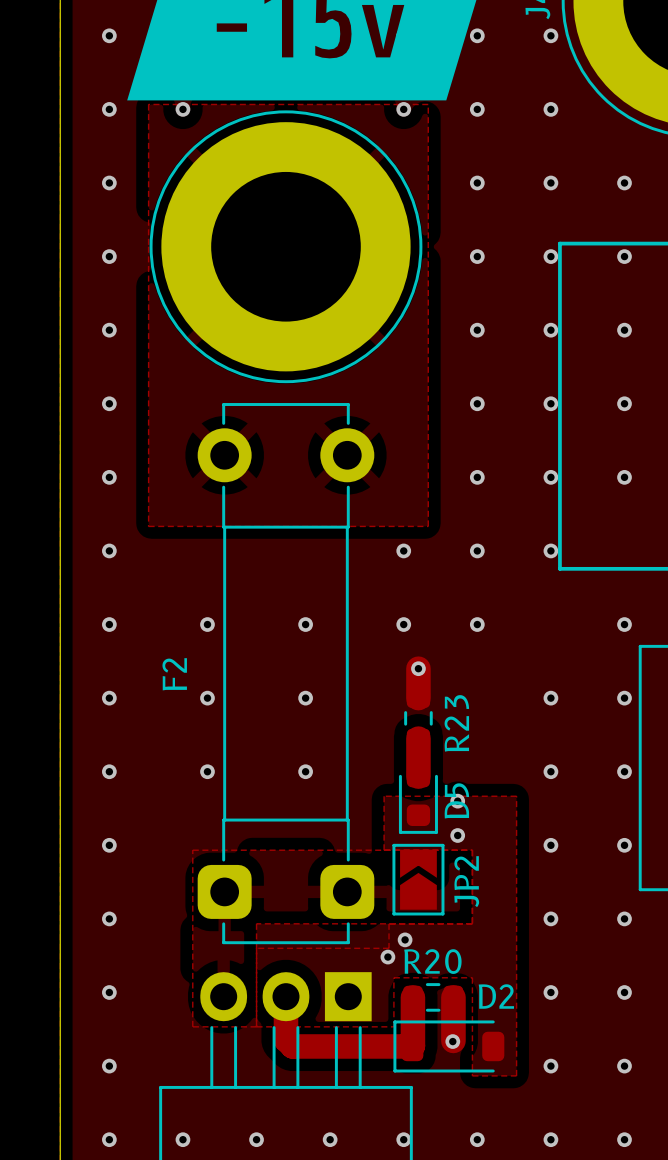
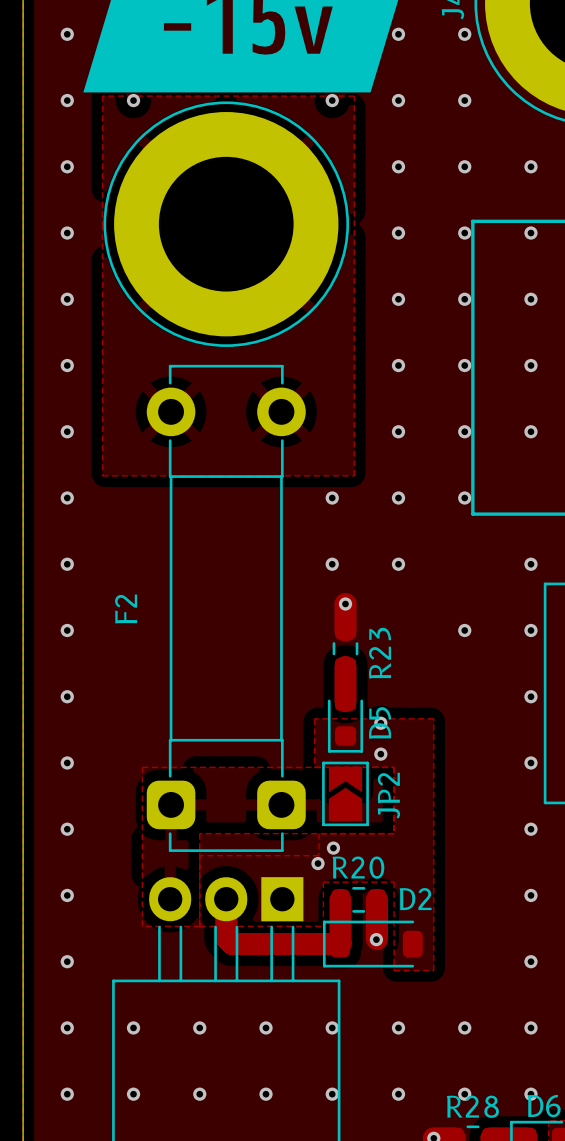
via: (207, 624) -> none
via: (305, 624) -> none
via: (207, 698) -> none
via: (305, 698) -> none
via: (207, 771) -> none
via: (305, 771) -> none
via: (550, 771) -> none
via: (550, 845) -> none
via: (550, 918) -> none
via: (550, 992) -> none
via: (550, 1066) -> none

